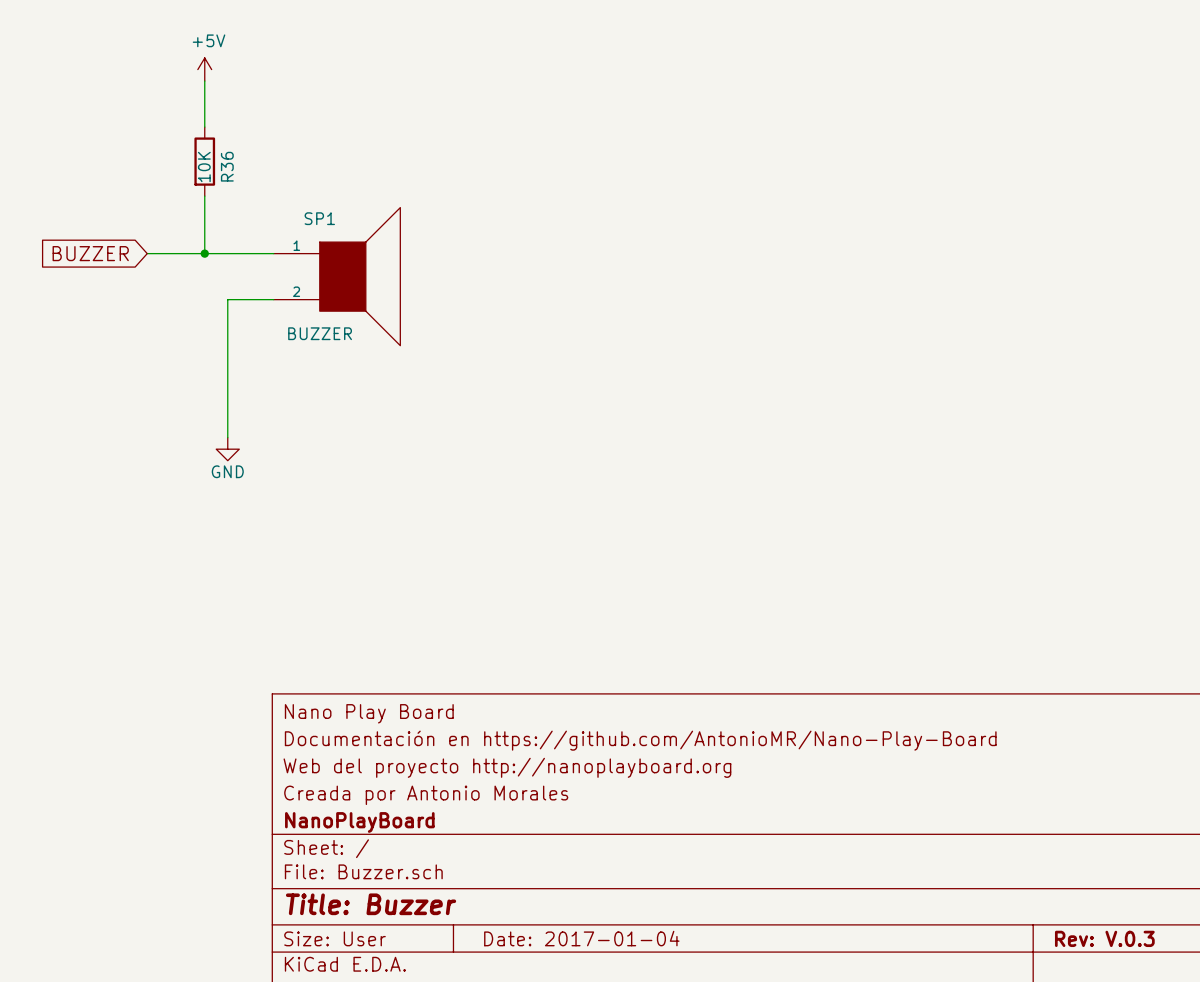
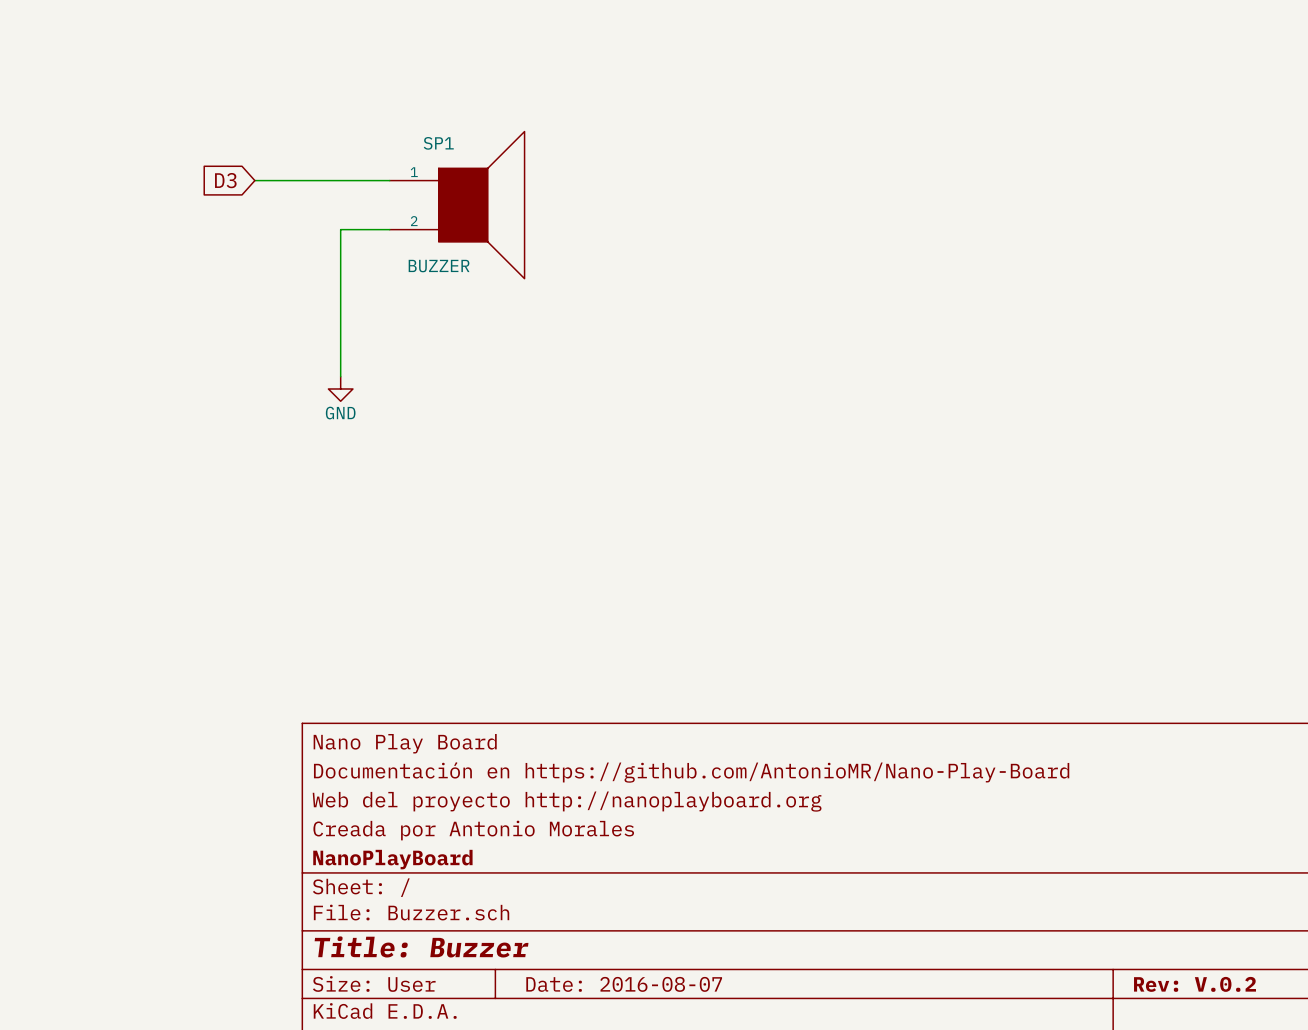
power symbol: +5V (204, 69) -> none
wire: (204, 81) (204, 127) -> none
R36: 10K (204, 161) -> none
global label: none -> D3 (225, 180)
wire: (204, 196) (204, 253) -> none
global label: BUZZER (90, 253) -> none
wire: (147, 253) (273, 253) -> (254, 180) (389, 180)
junction: (204, 253) -> none
SP1 position: (337, 276) -> (457, 205)
wire: (273, 299) (227, 299) (227, 437) -> (389, 229) (340, 229) (340, 376)
power symbol position: GND (227, 449) -> GND (340, 388)
title block: Date: 2017-01-04 (581, 938) -> Date: 2016-08-07 (624, 984)
title block: Rev: V.0.3 (1104, 938) -> Rev: V.0.2 (1195, 984)

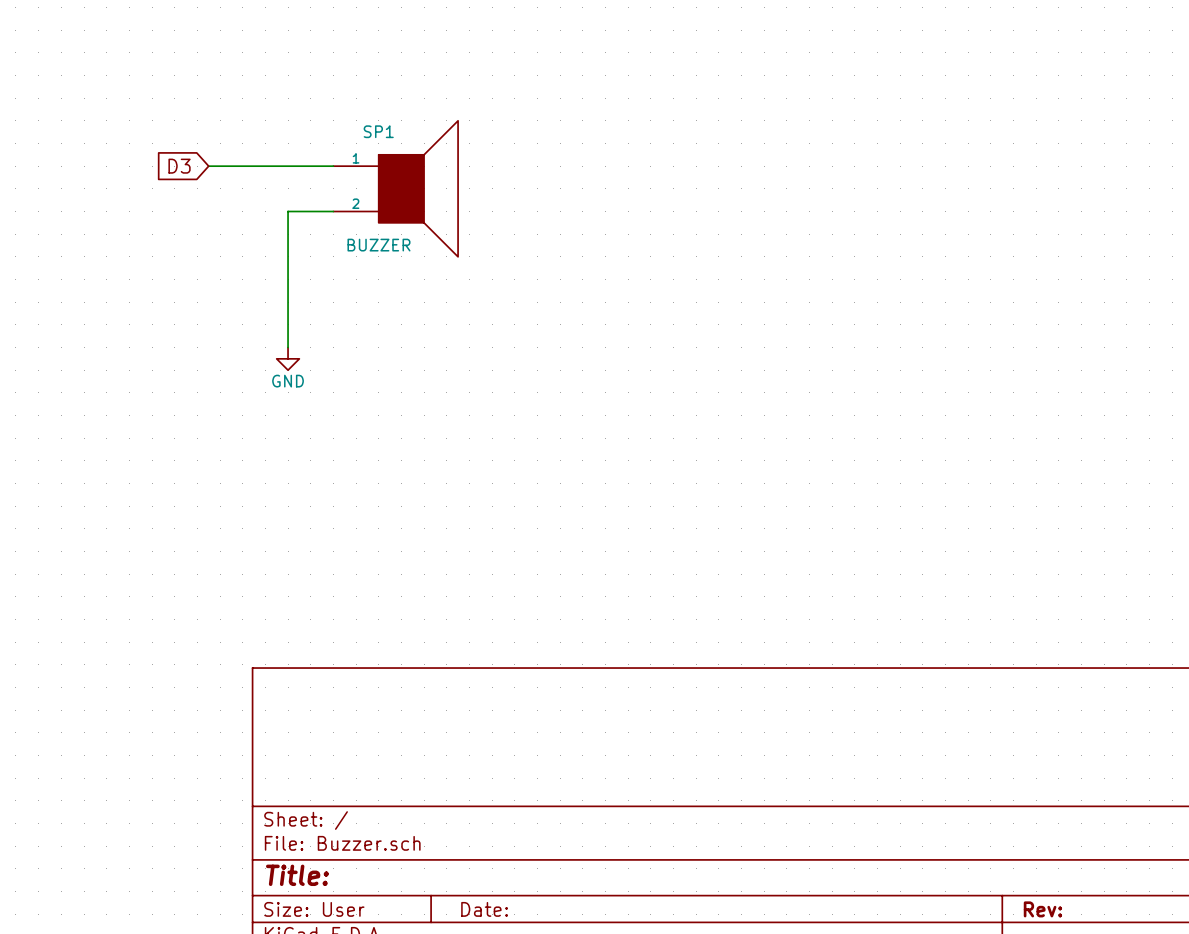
title block: Nano Play Board (405, 743) -> none
title block: Documentación en https://github.com/AntonioMR/Nano-Play-Board (691, 772) -> none
title block: Web del proyecto http://nanoplayboard.org (567, 801) -> none
title block: Creada por Antonio Morales (473, 830) -> none
title block: NanoPlayBoard (392, 859) -> none
title block: Title: Buzzer (421, 946) -> Title: (297, 875)
title block: Date: 2016-08-07 (624, 984) -> Date: (484, 909)
title block: Rev: V.0.2 (1195, 984) -> Rev: (1042, 909)

